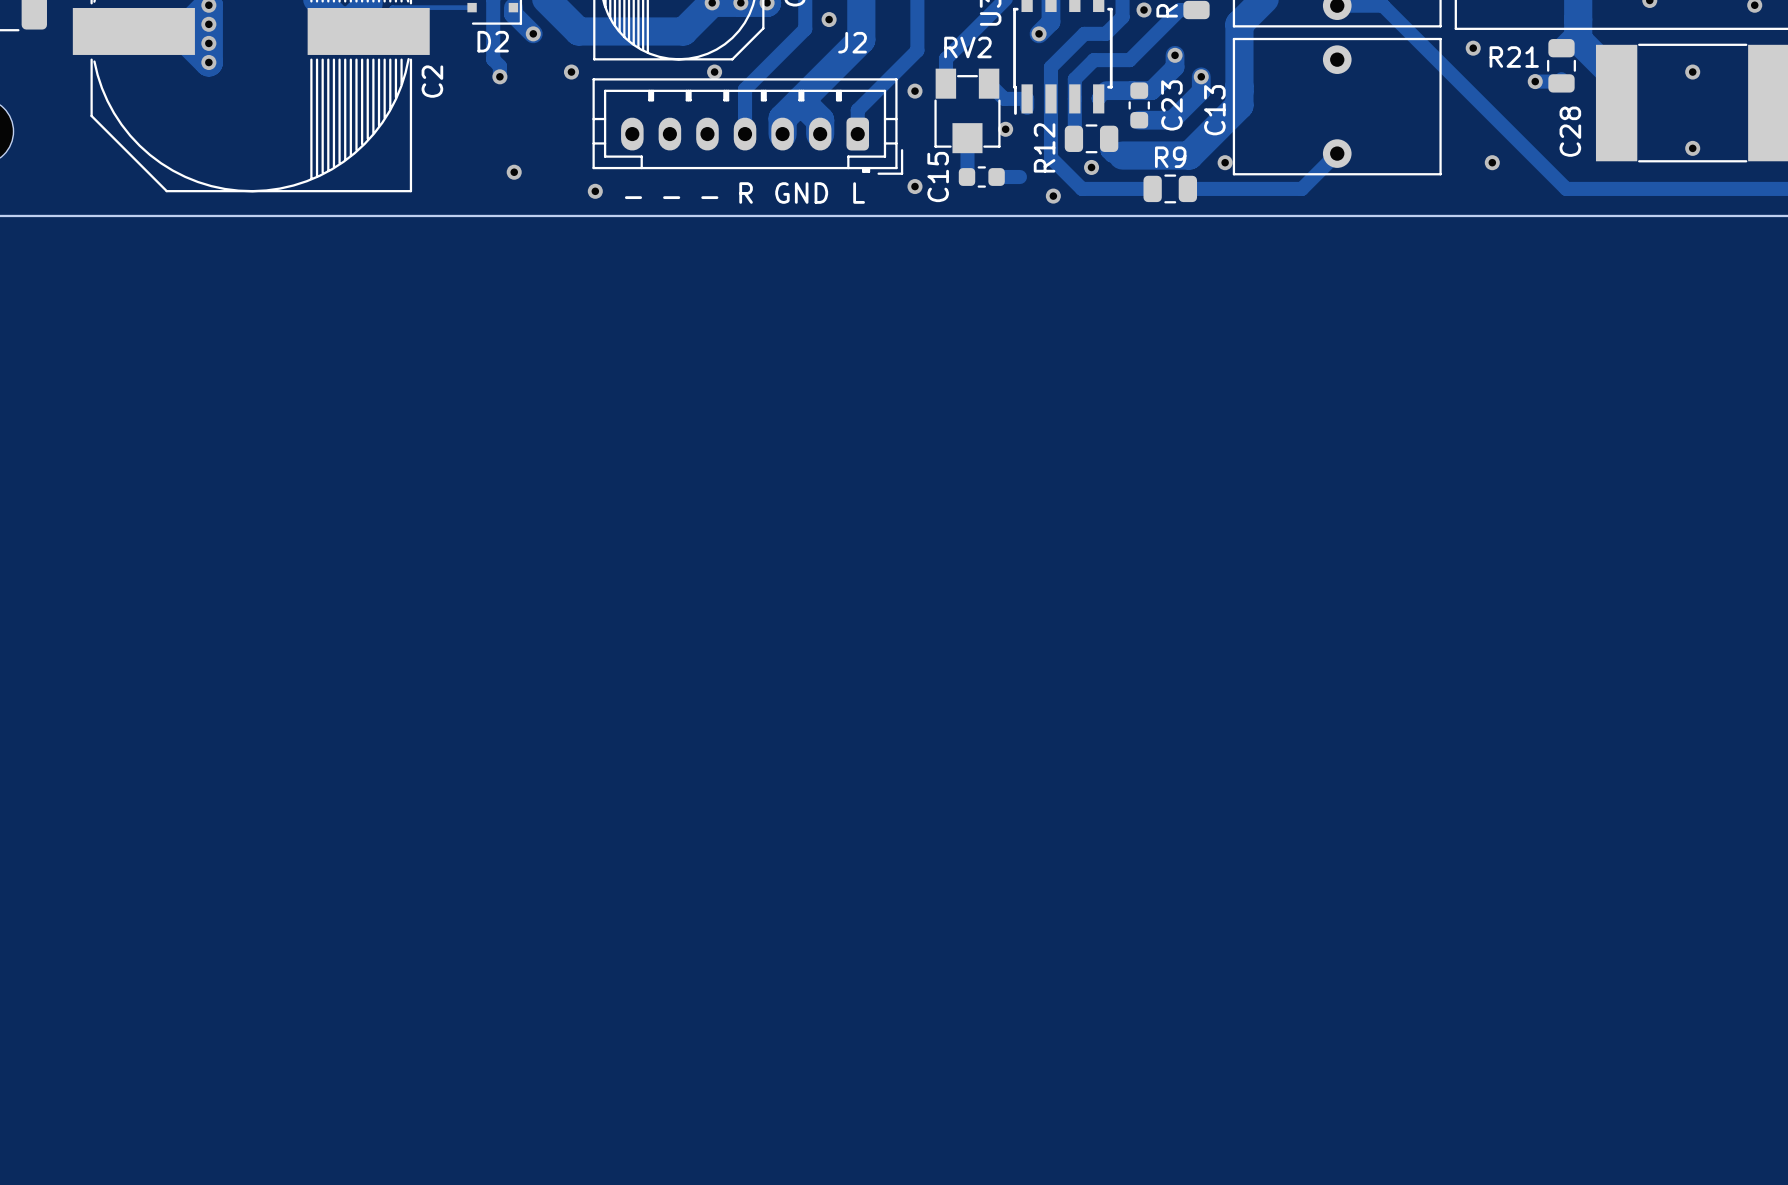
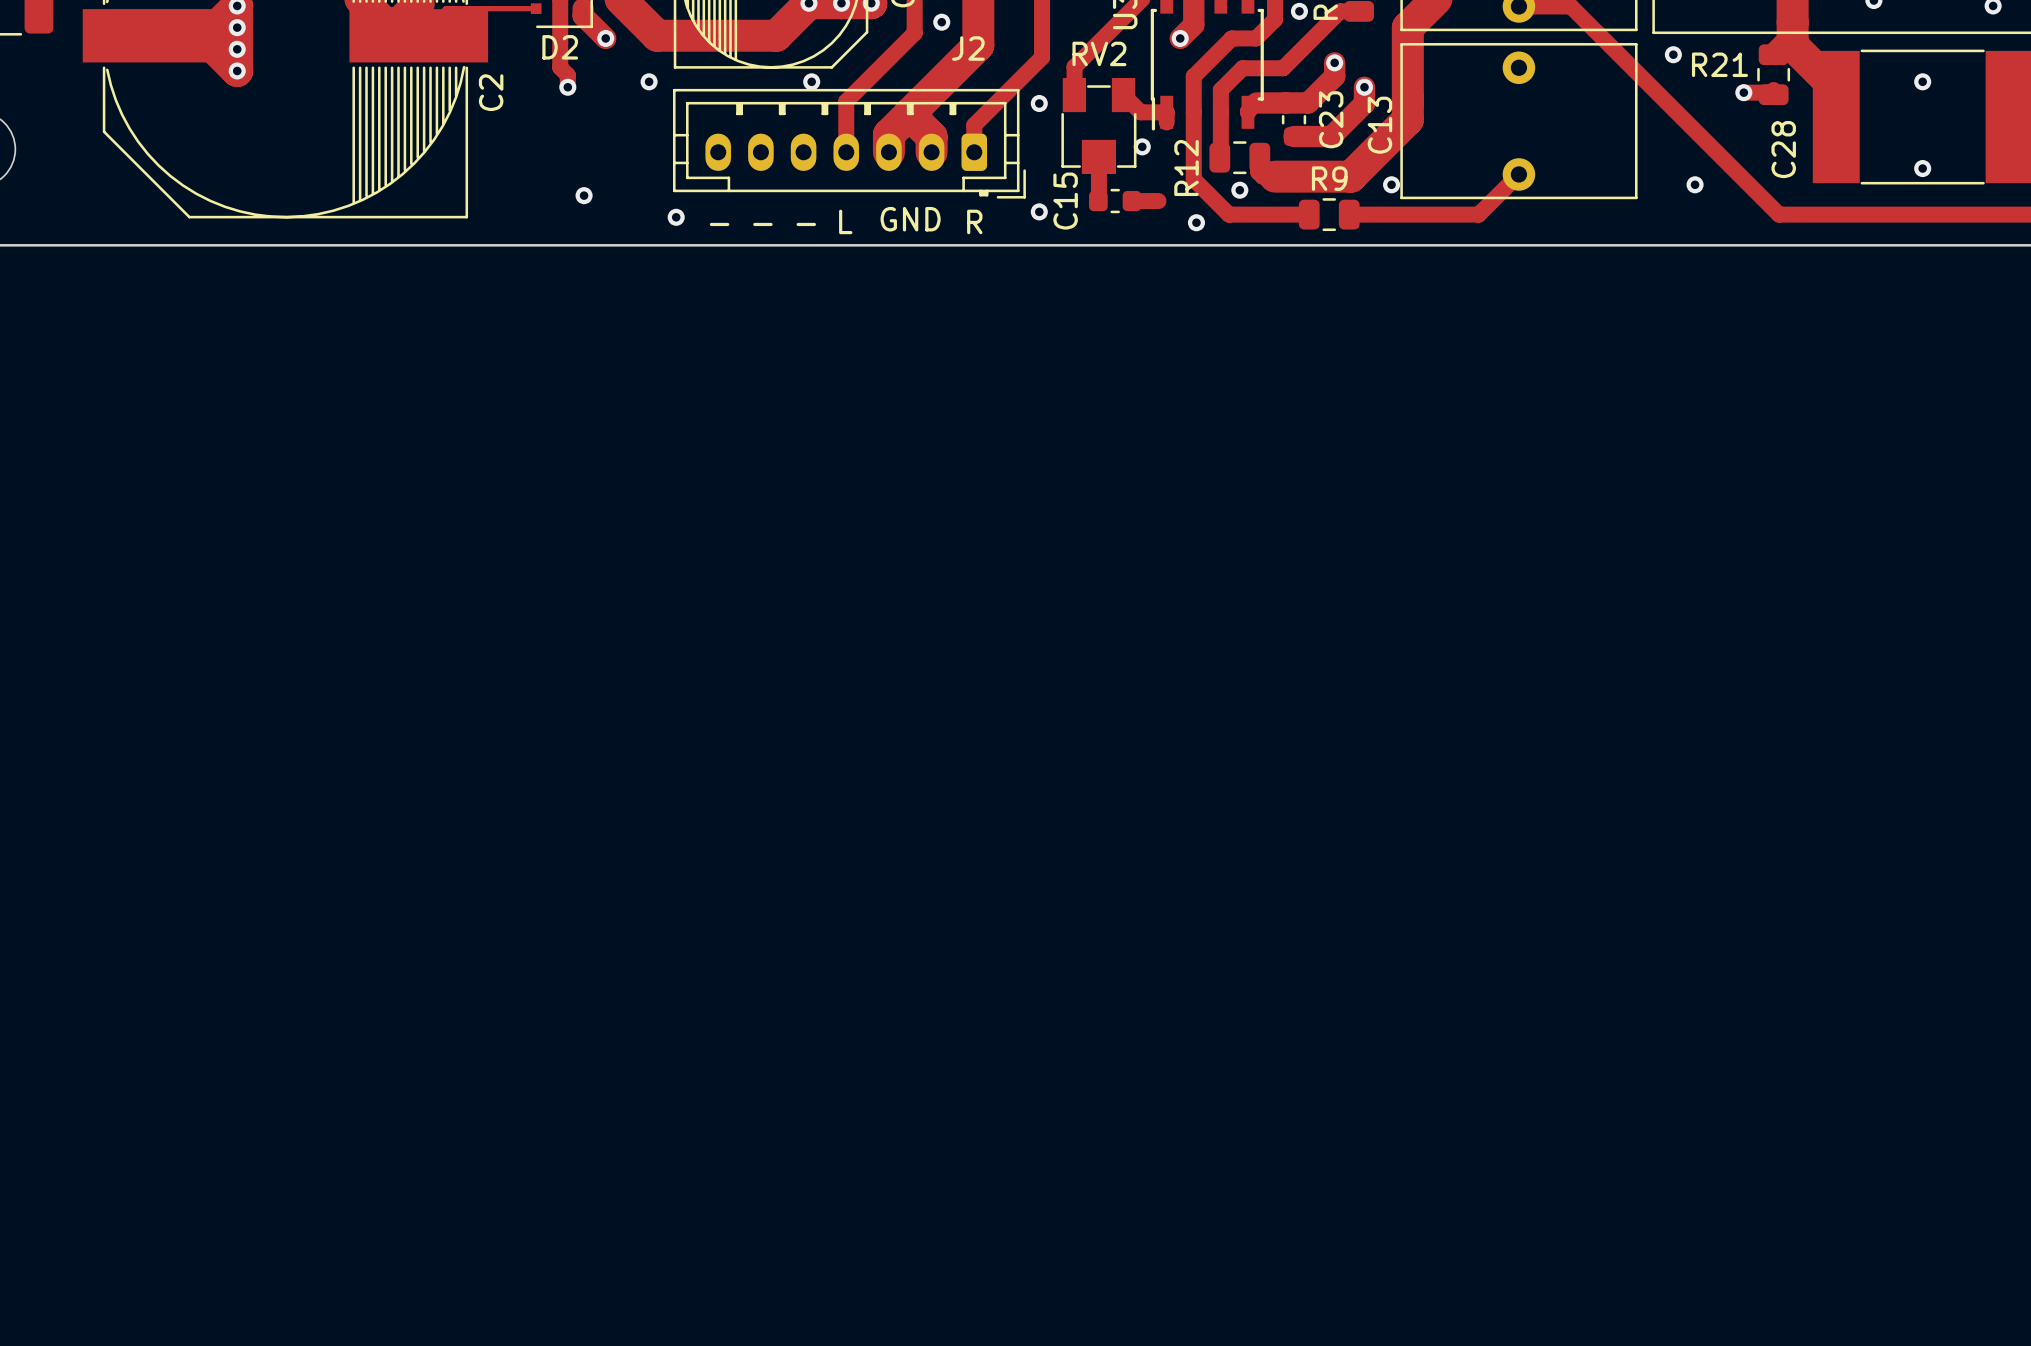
text: R (746, 193) -> L (845, 221)
text: L (859, 193) -> R (974, 221)

